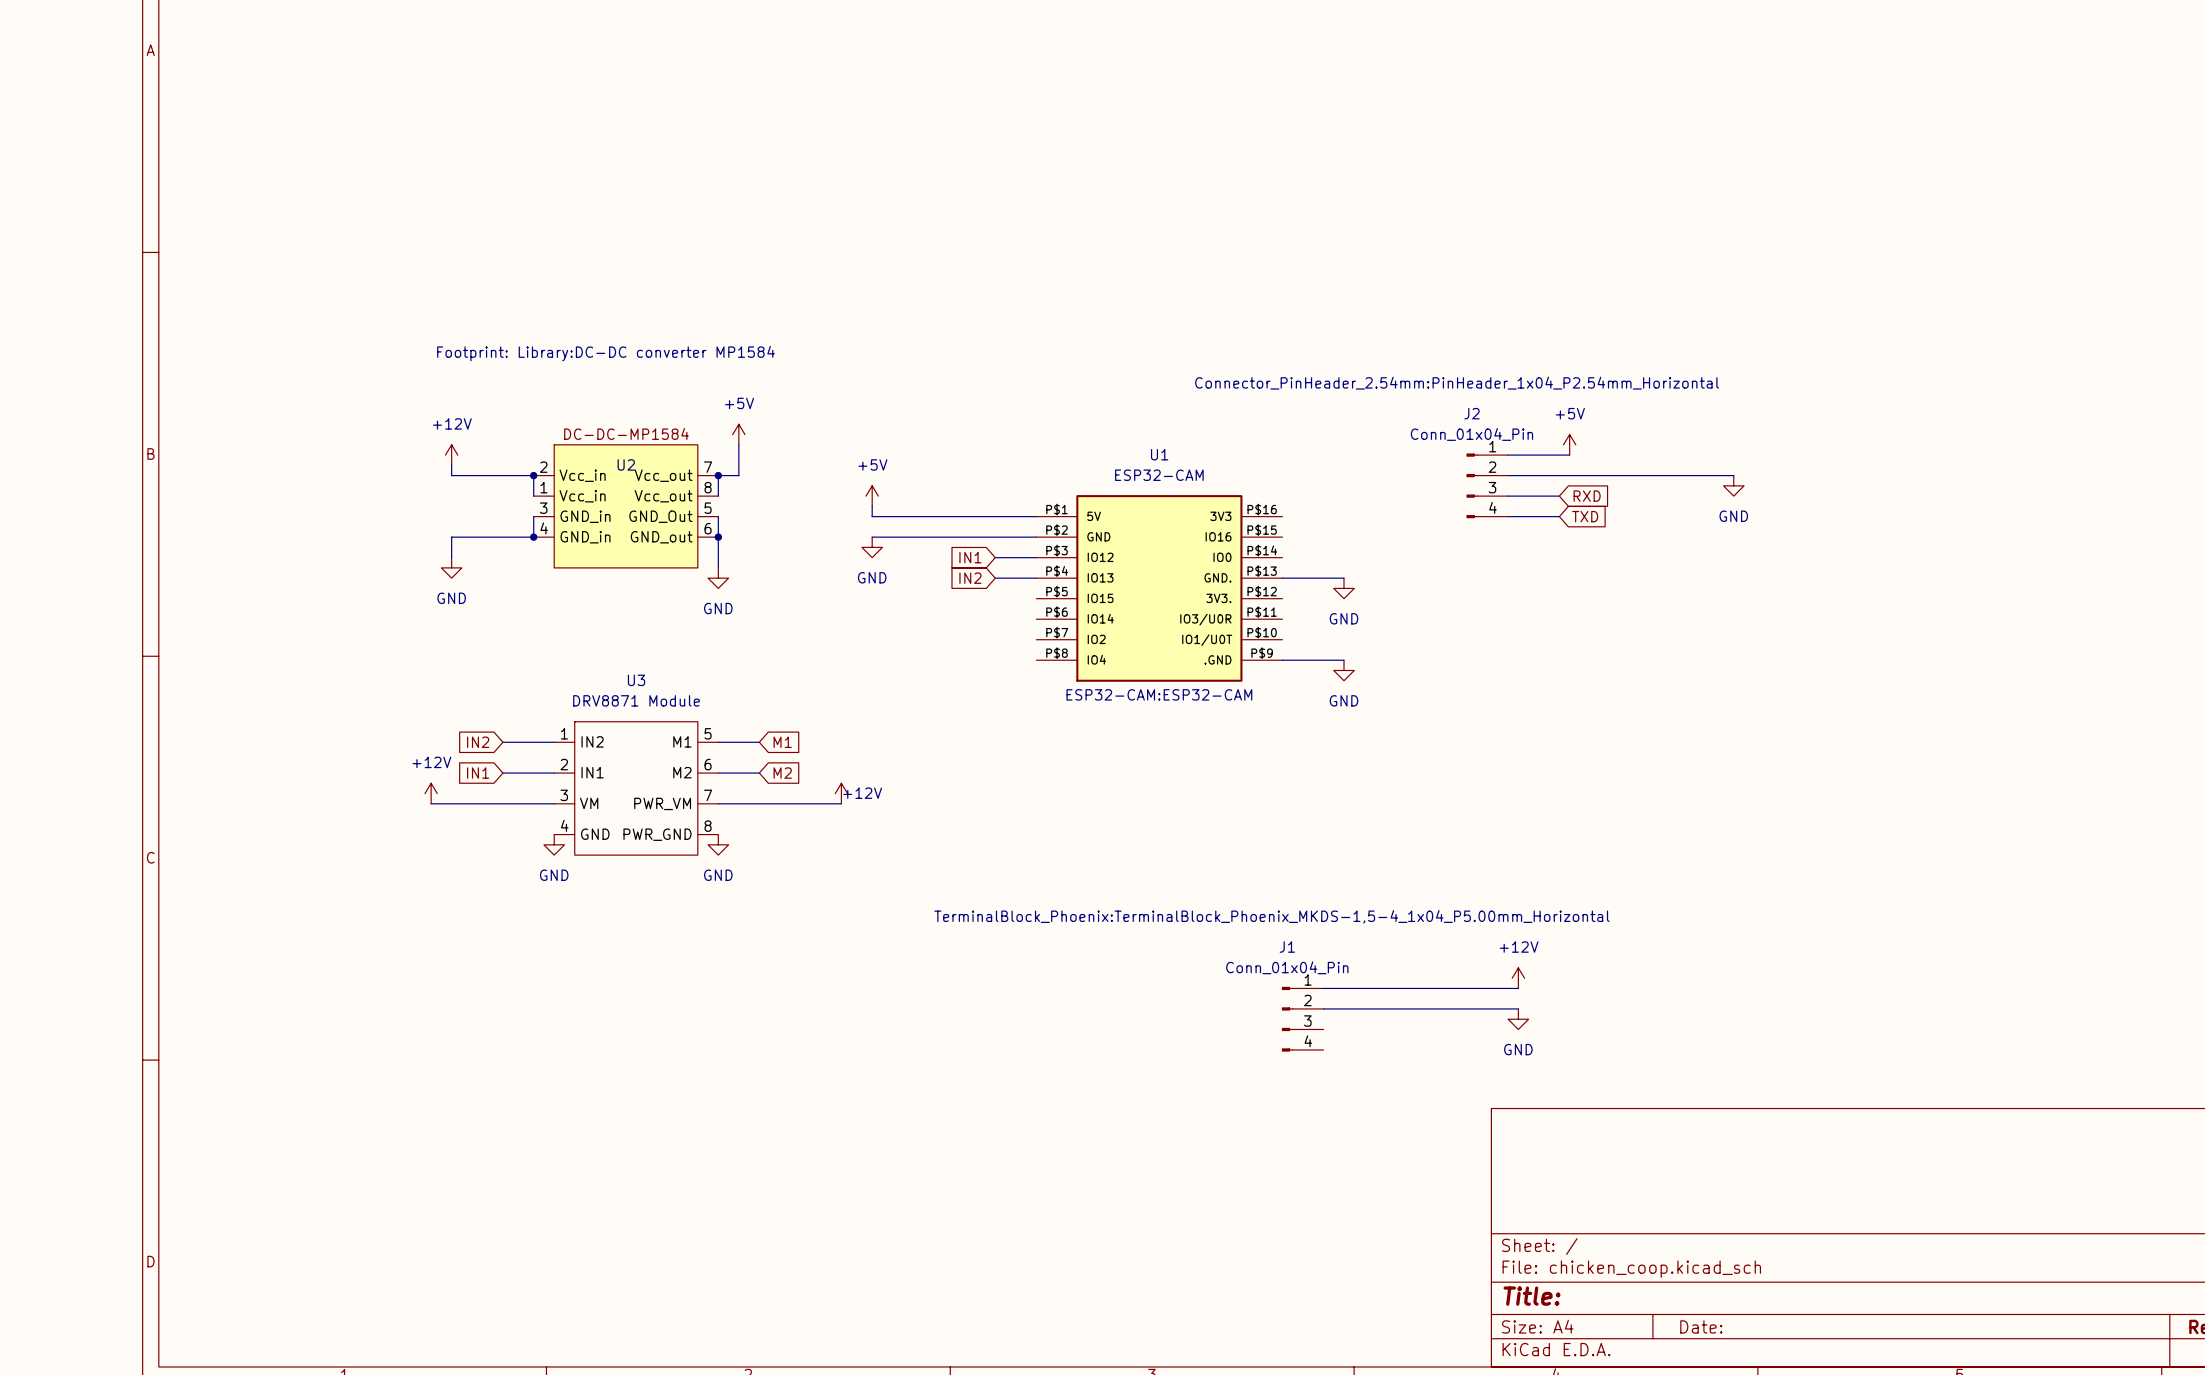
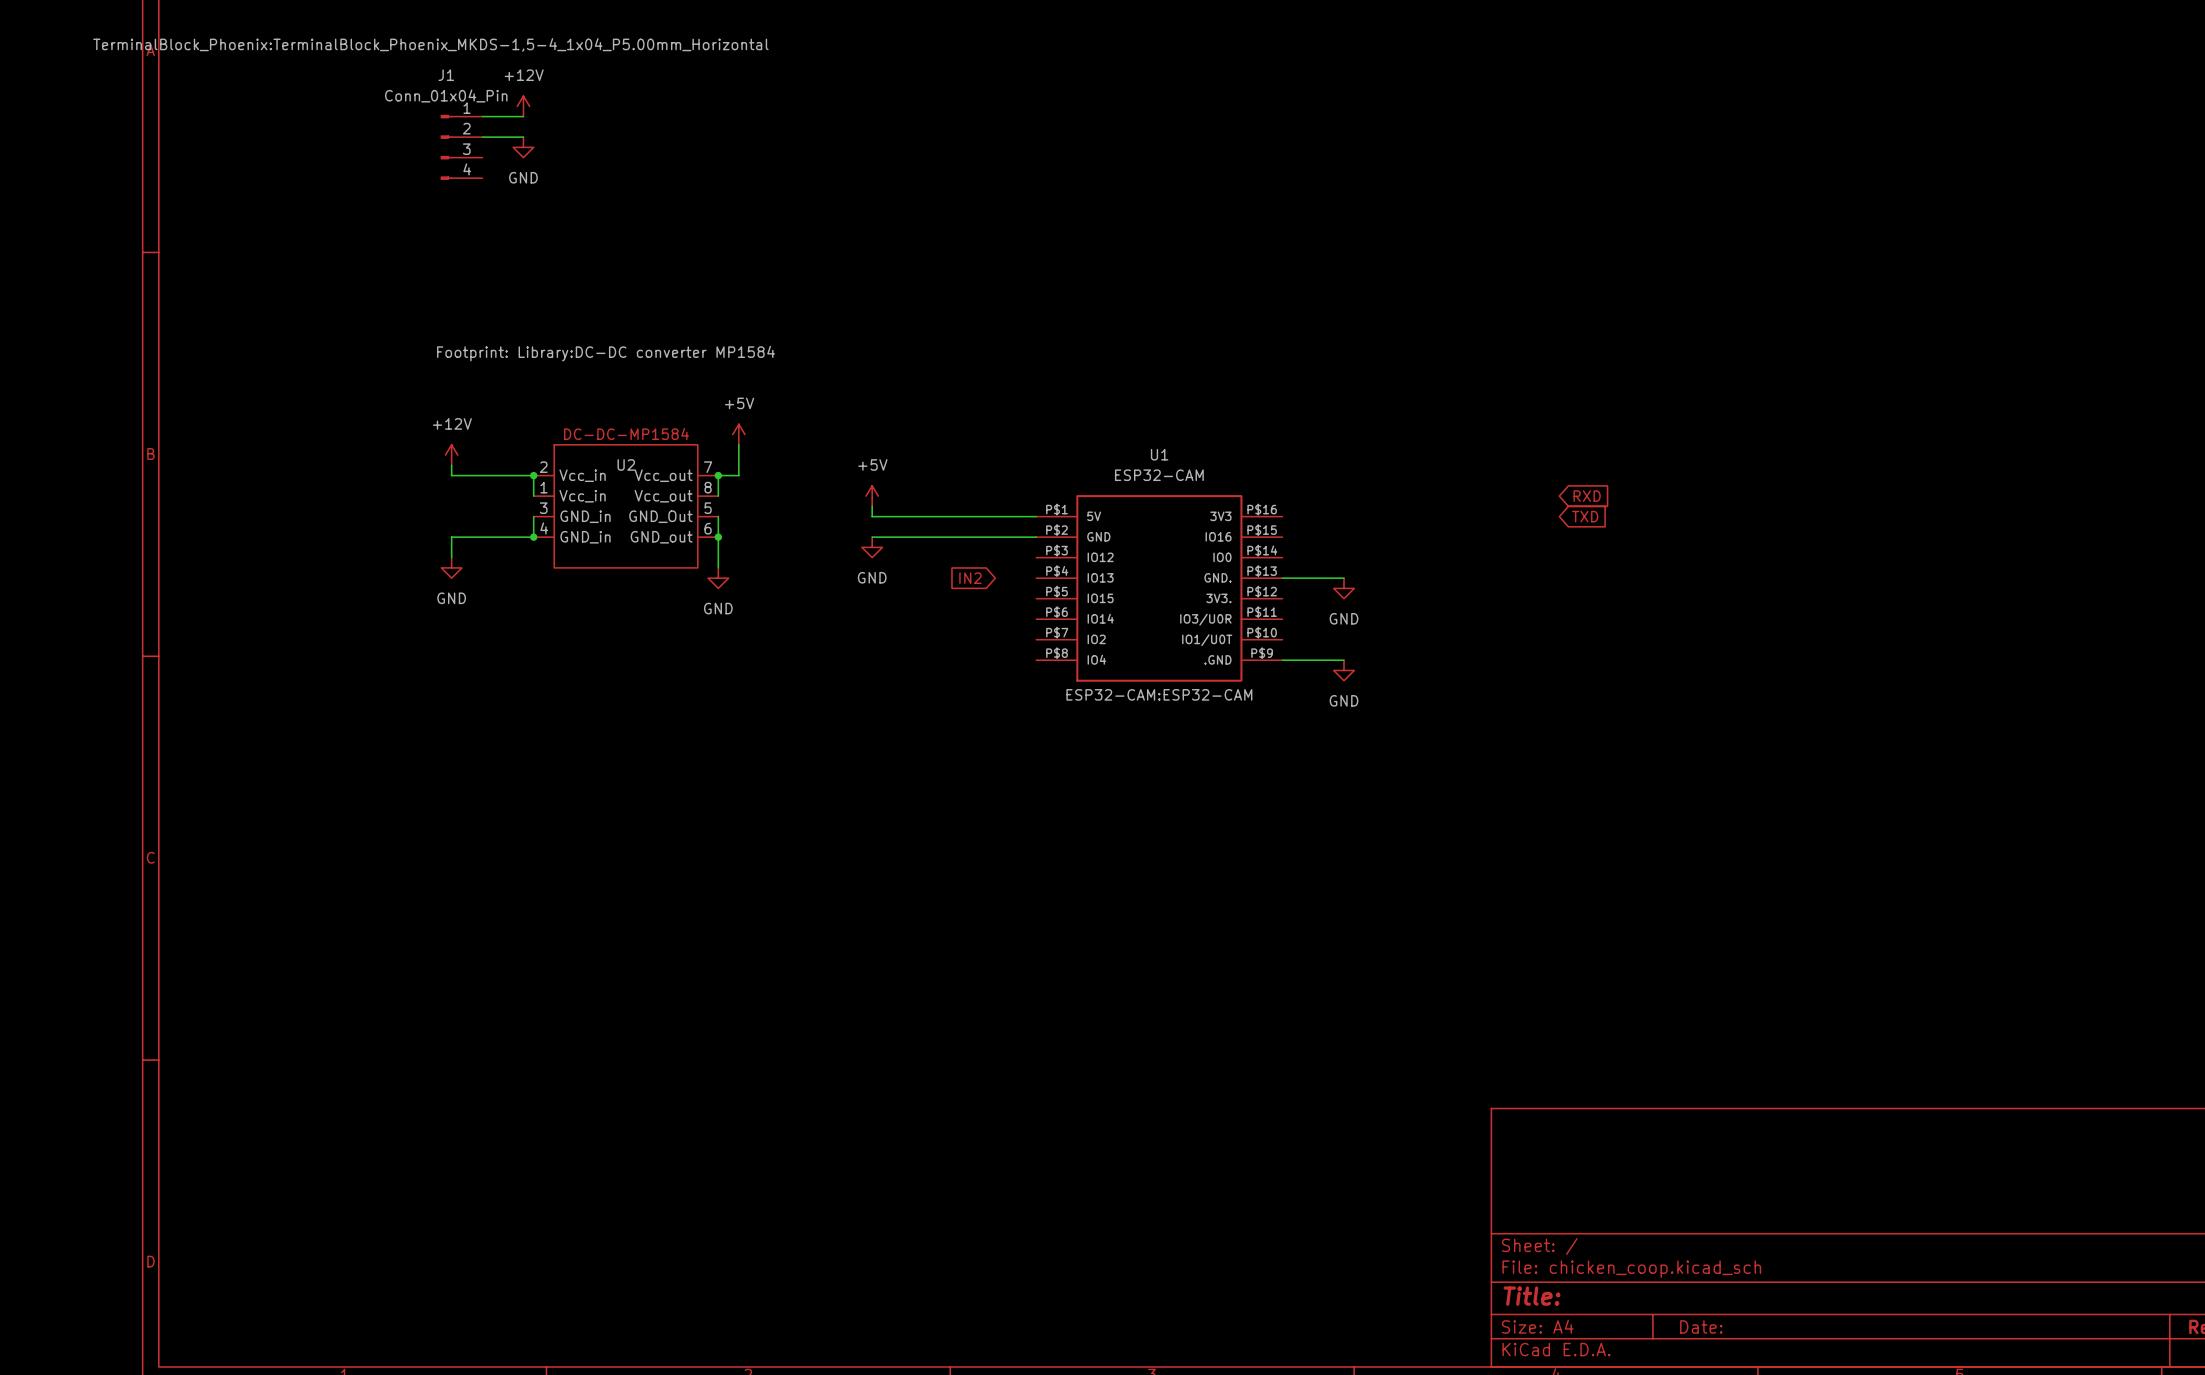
power symbol: none -> +12V (523, 106)
wire: none -> (482, 116) (523, 116)
wire: none -> (482, 137) (523, 137)
power symbol: none -> GND (523, 147)
power symbol: +5V (1569, 444) -> none
wire: (1508, 455) (1569, 455) -> none
wire: (1508, 475) (1733, 475) -> none
J2: Conn_01x04_Pin (1487, 485) -> none
power symbol: GND (1733, 485) -> none
wire: (1508, 496) (1559, 496) -> none
wire: (1508, 516) (1559, 516) -> none
global label: IN1 (970, 557) -> none
wire: (995, 557) (1036, 557) -> none
wire: (995, 578) (1036, 578) -> none
global label: IN2 (478, 742) -> none
wire: (502, 742) (554, 742) -> none
wire: (718, 742) (759, 742) -> none
global label: M1 (782, 742) -> none
global label: IN1 (478, 773) -> none
wire: (502, 773) (554, 773) -> none
wire: (718, 773) (759, 773) -> none
global label: M2 (782, 773) -> none
U3: DRV8871 Module (636, 788) -> none
power symbol: +12V (431, 793) -> none
power symbol: +12V (841, 793) -> none
wire: (431, 803) (554, 803) -> none
wire: (718, 803) (841, 803) -> none
power symbol: GND (554, 844) -> none
power symbol: GND (718, 844) -> none
power symbol: +12V (1518, 978) -> none
wire: (1323, 988) (1518, 988) -> none
wire: (1323, 1008) (1518, 1008) -> none
J1 position: (1302, 1019) -> (461, 147)
power symbol: GND (1518, 1019) -> none

